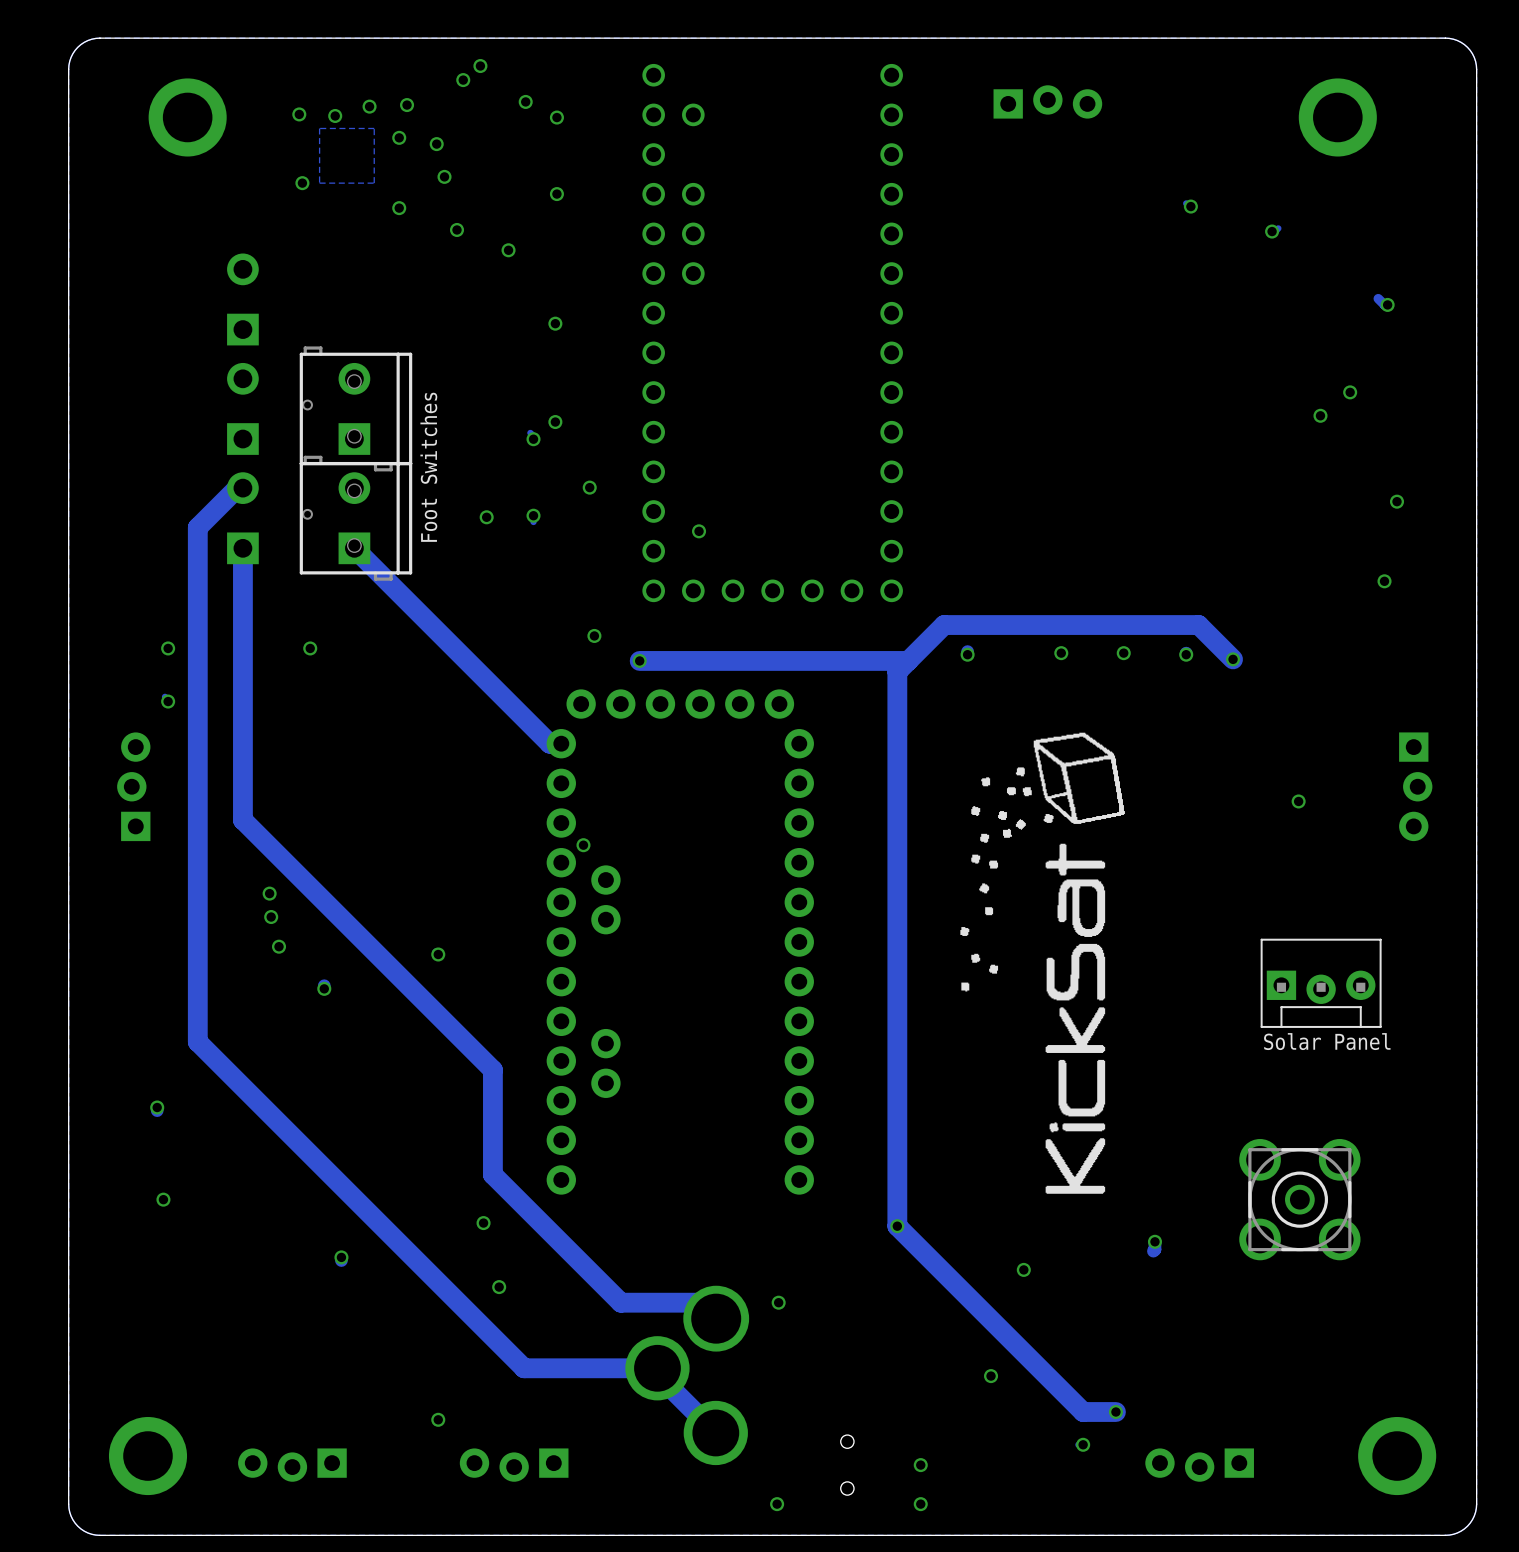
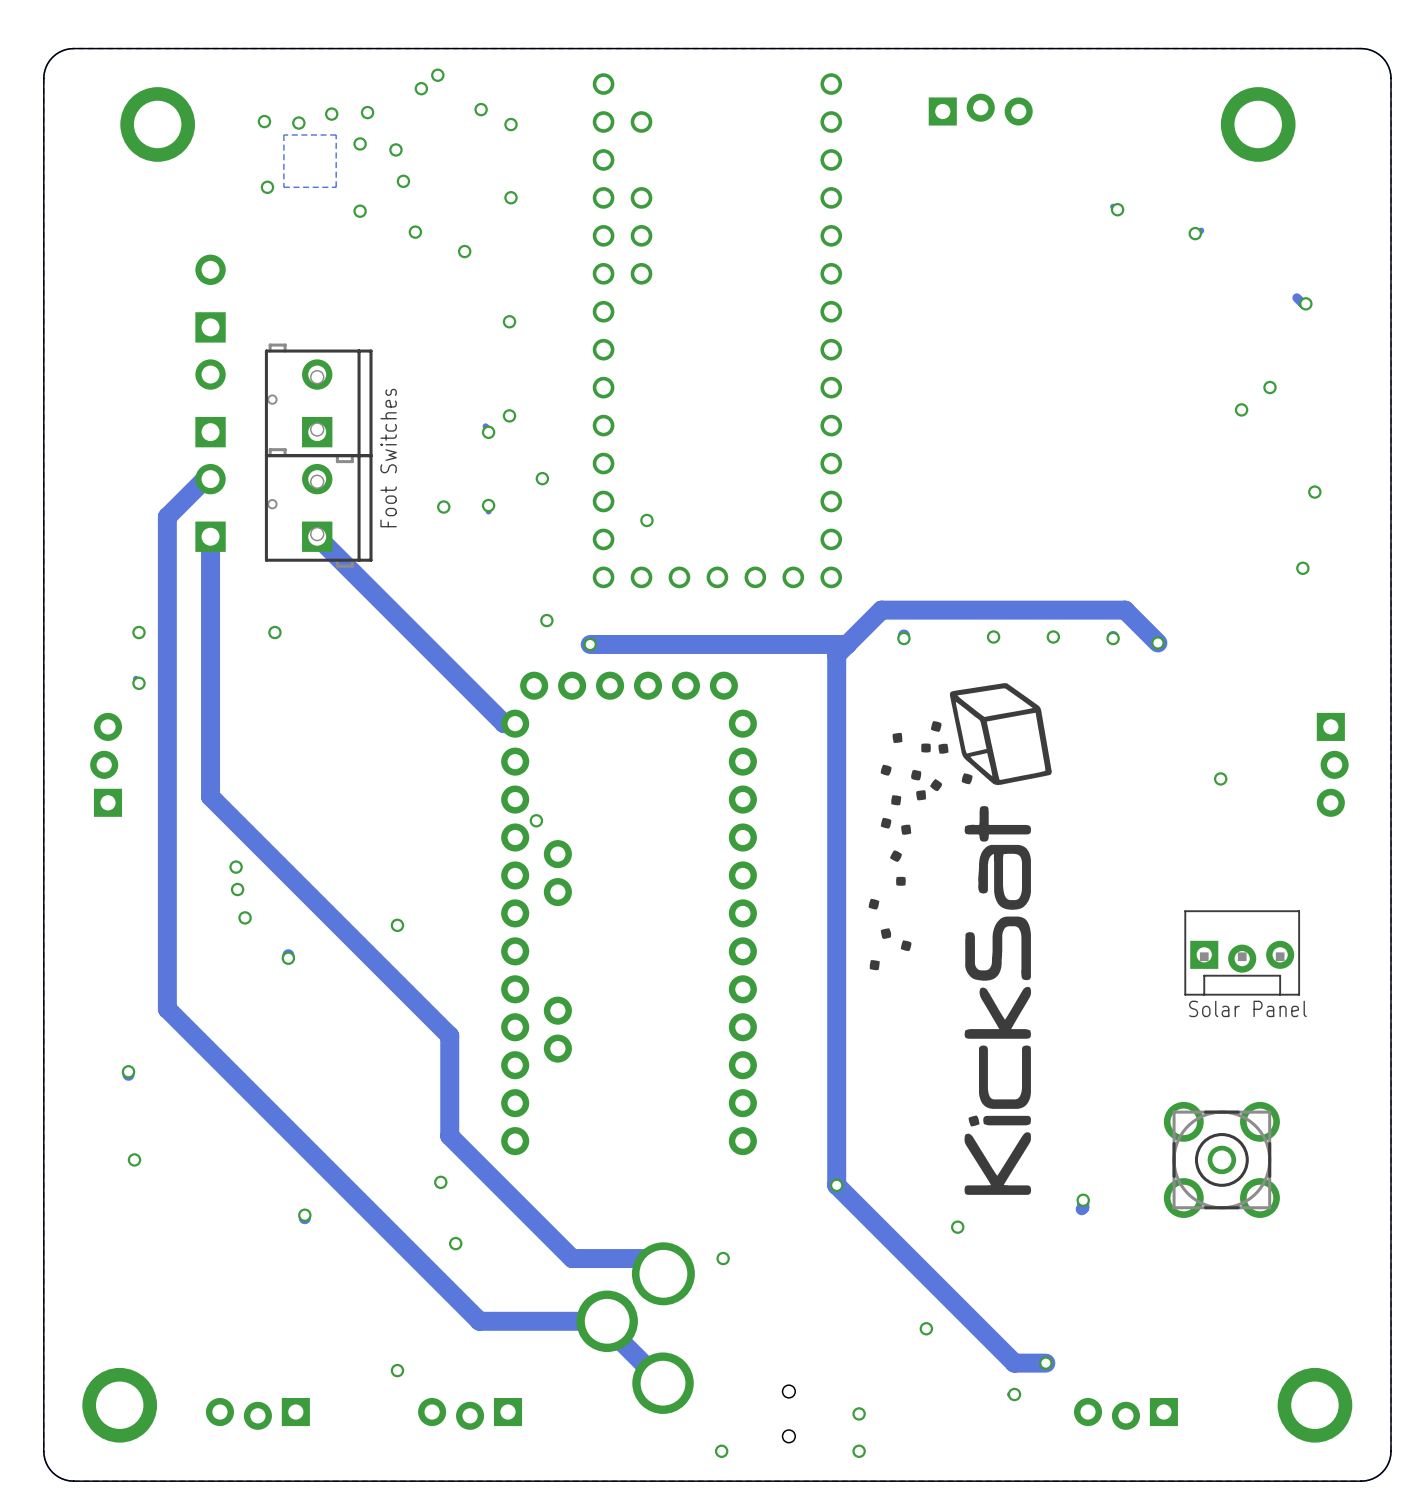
drawing: none -> [868, 683, 1052, 1195]
drawing: [960, 732, 1125, 1194] -> none

